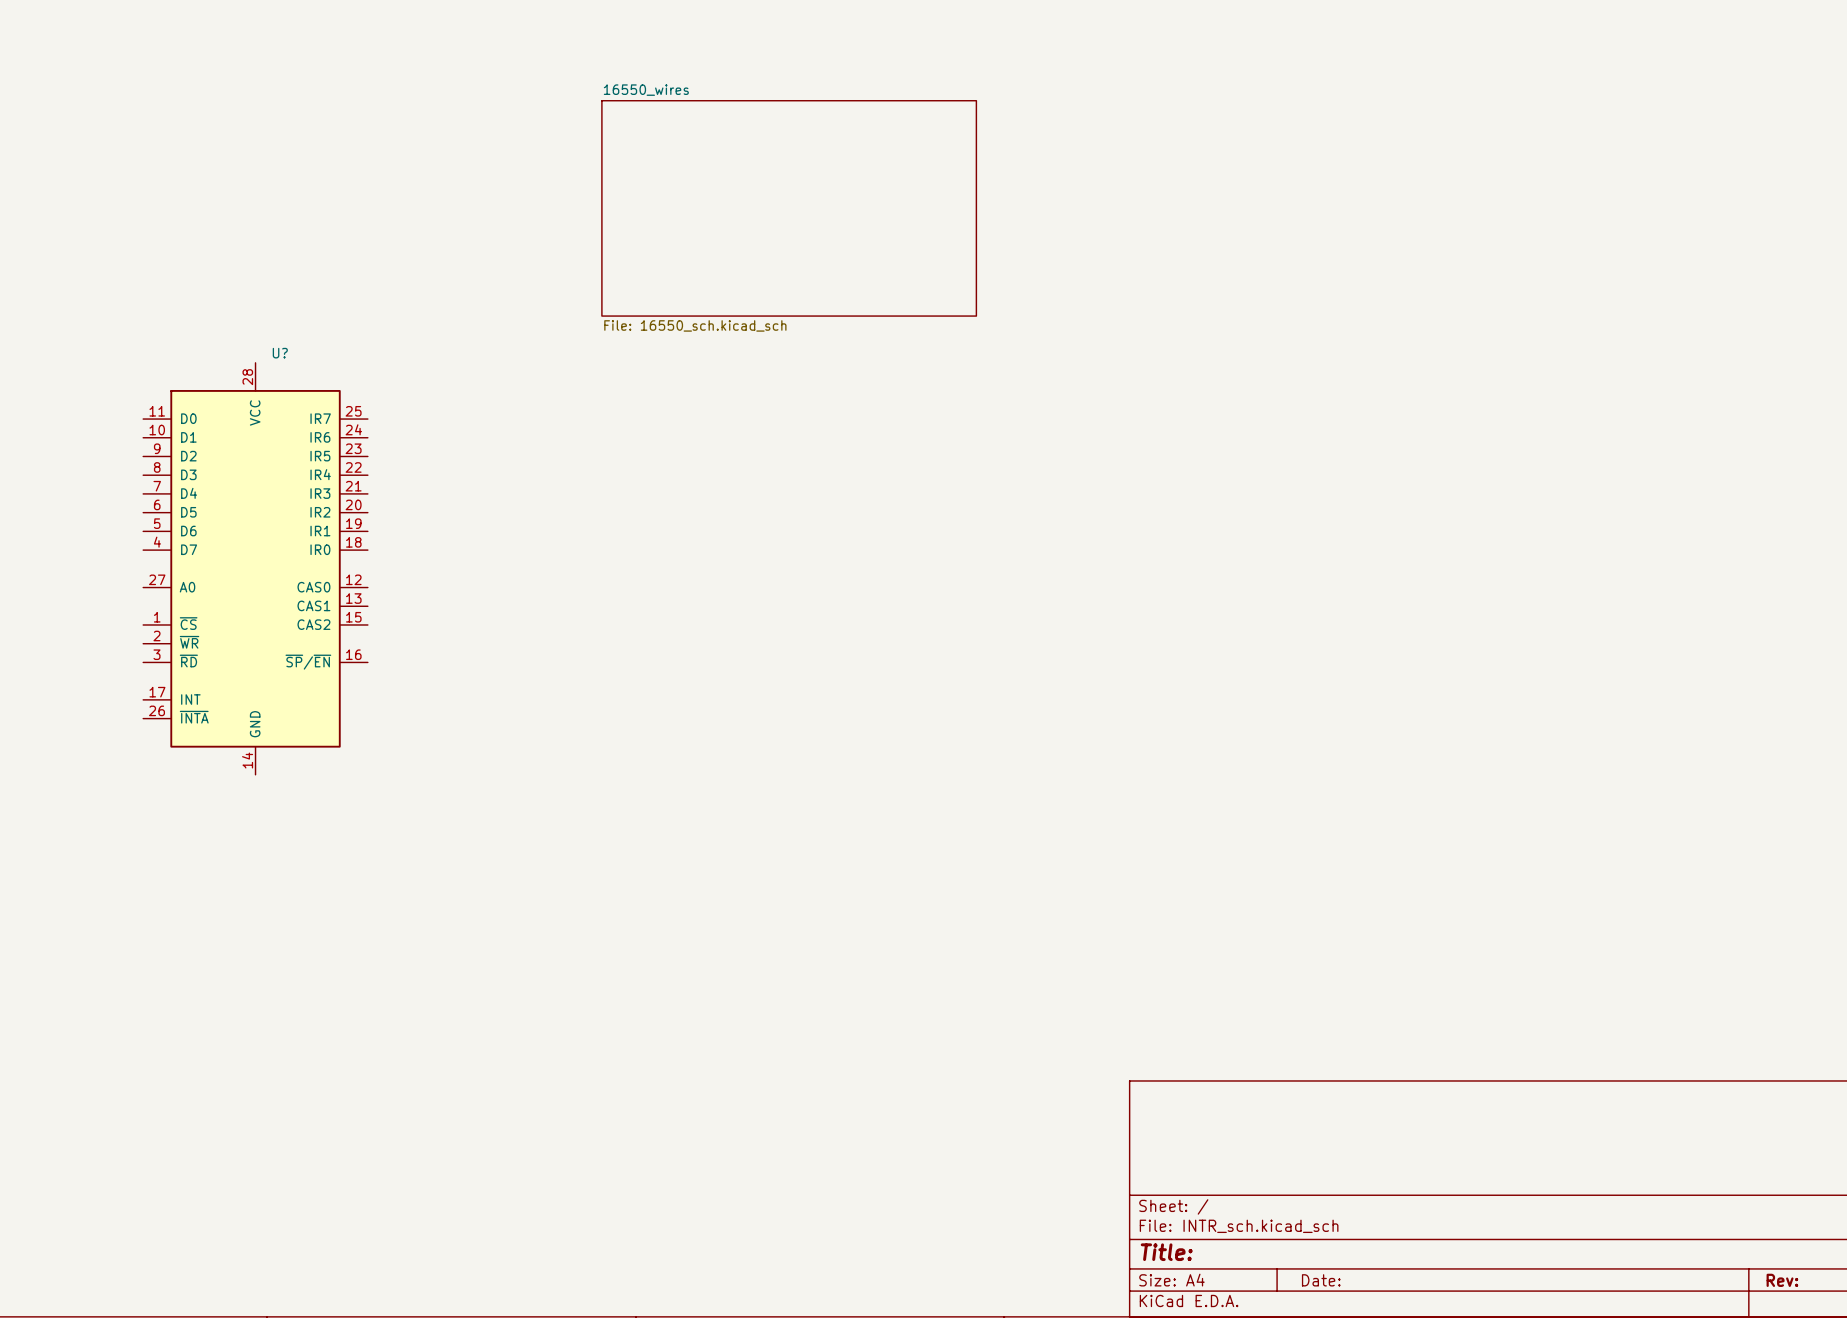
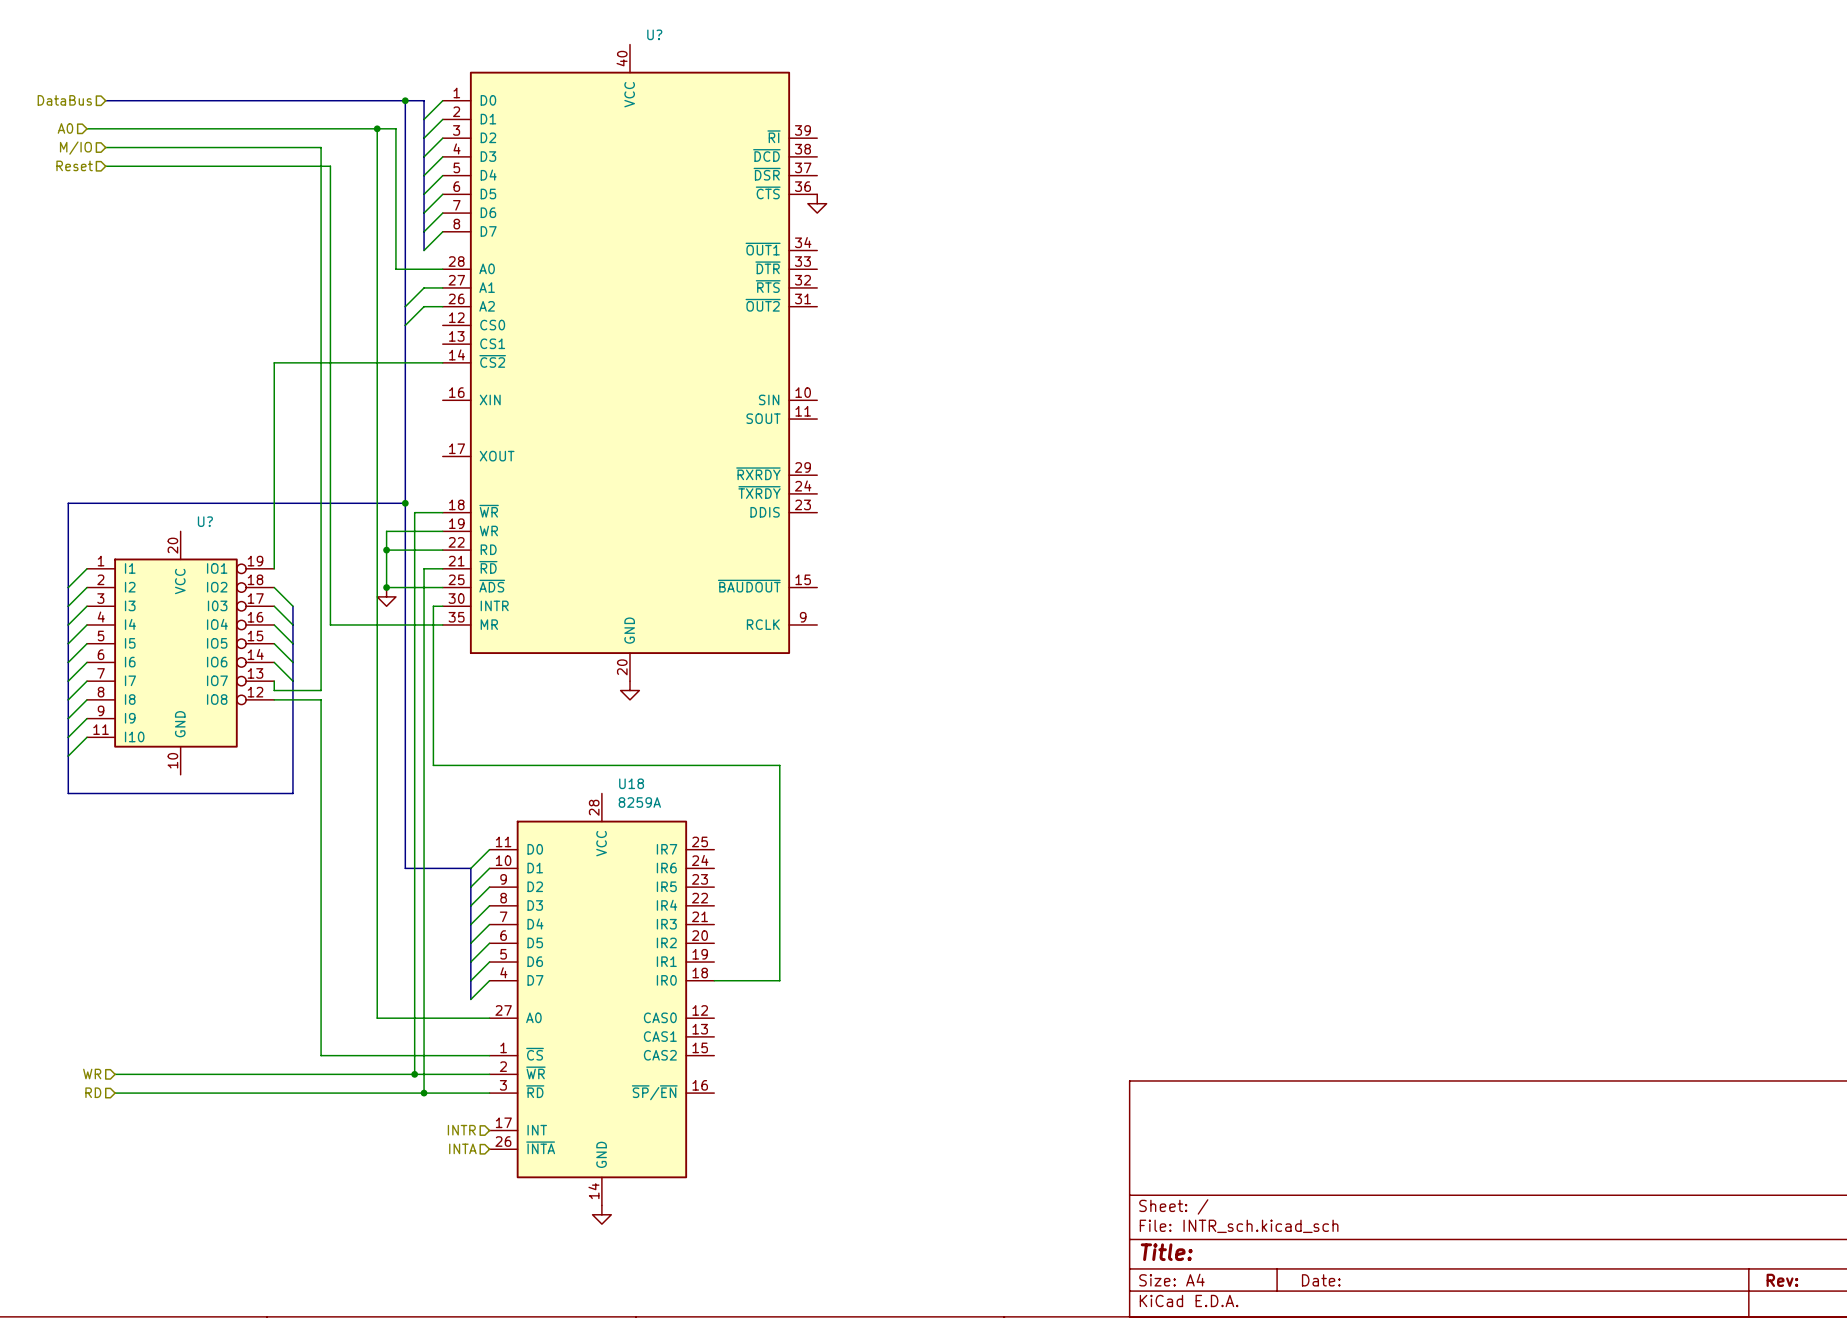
hierarchical label: none -> DataBus (64, 100)
bus: none -> (105, 100) (424, 100) (424, 250)
bus: none -> (405, 100) (405, 868) (470, 868) (470, 999)
junction: none -> (405, 100)
wire: none -> (442, 100) (424, 119)
wire: none -> (442, 119) (424, 138)
hierarchical label: none -> A0 (65, 128)
wire: none -> (87, 128) (395, 128) (395, 269) (442, 269)
wire: none -> (377, 128) (377, 1018) (489, 1018)
junction: none -> (377, 128)
wire: none -> (442, 138) (424, 156)
wire: none -> (105, 147) (321, 147) (321, 690) (274, 690) (274, 681)
hierarchical label: none -> M/IO (75, 148)
wire: none -> (442, 156) (424, 175)
hierarchical label: none -> Reset (74, 165)
wire: none -> (105, 166) (330, 166) (330, 624) (442, 624)
wire: none -> (442, 175) (424, 194)
wire: none -> (442, 194) (424, 213)
power symbol: none -> (817, 203)
sheet 16550_wires: File: 16550_sch.kicad_sch (789, 208) -> none
wire: none -> (442, 213) (424, 231)
wire: none -> (442, 231) (424, 250)
wire: none -> (442, 287) (424, 287) (405, 306)
wire: none -> (442, 306) (424, 306) (405, 325)
wire: none -> (442, 362) (274, 362) (274, 568)
U?: none -> (630, 362)
bus: none -> (405, 503) (68, 503) (68, 793) (292, 793) (292, 606)
junction: none -> (405, 503)
wire: none -> (442, 512) (414, 512) (414, 1074)
wire: none -> (442, 531) (386, 531) (386, 587) (442, 587)
wire: none -> (386, 550) (442, 550)
junction: none -> (386, 550)
wire: none -> (87, 568) (68, 587)
U?: (255, 568) -> none
wire: none -> (442, 568) (424, 568) (424, 1093)
wire: none -> (87, 587) (68, 606)
junction: none -> (386, 587)
power symbol: none -> (386, 596)
wire: none -> (87, 606) (68, 624)
wire: none -> (442, 606) (433, 606) (433, 765) (779, 765) (779, 980) (714, 980)
wire: none -> (87, 624) (68, 643)
wire: none -> (87, 643) (68, 662)
U?: none -> (180, 653)
wire: none -> (87, 662) (68, 681)
wire: none -> (87, 681) (68, 699)
power symbol: none -> (630, 690)
wire: none -> (87, 699) (68, 718)
wire: none -> (274, 699) (321, 699) (321, 1055) (489, 1055)
wire: none -> (87, 718) (68, 737)
wire: none -> (87, 737) (68, 756)
wire: none -> (489, 849) (470, 868)
wire: none -> (489, 868) (470, 887)
wire: none -> (489, 887) (470, 905)
wire: none -> (489, 905) (470, 924)
wire: none -> (489, 924) (470, 943)
wire: none -> (489, 943) (470, 962)
wire: none -> (489, 962) (470, 980)
wire: none -> (489, 980) (470, 999)
U18: none -> 8259A (601, 999)
hierarchical label: none -> WR (92, 1074)
wire: none -> (115, 1074) (489, 1074)
junction: none -> (414, 1074)
hierarchical label: none -> RD (93, 1092)
wire: none -> (115, 1093) (489, 1093)
junction: none -> (424, 1093)
hierarchical label: none -> INTR (461, 1130)
hierarchical label: none -> INTA (462, 1148)
power symbol: none -> (601, 1214)

